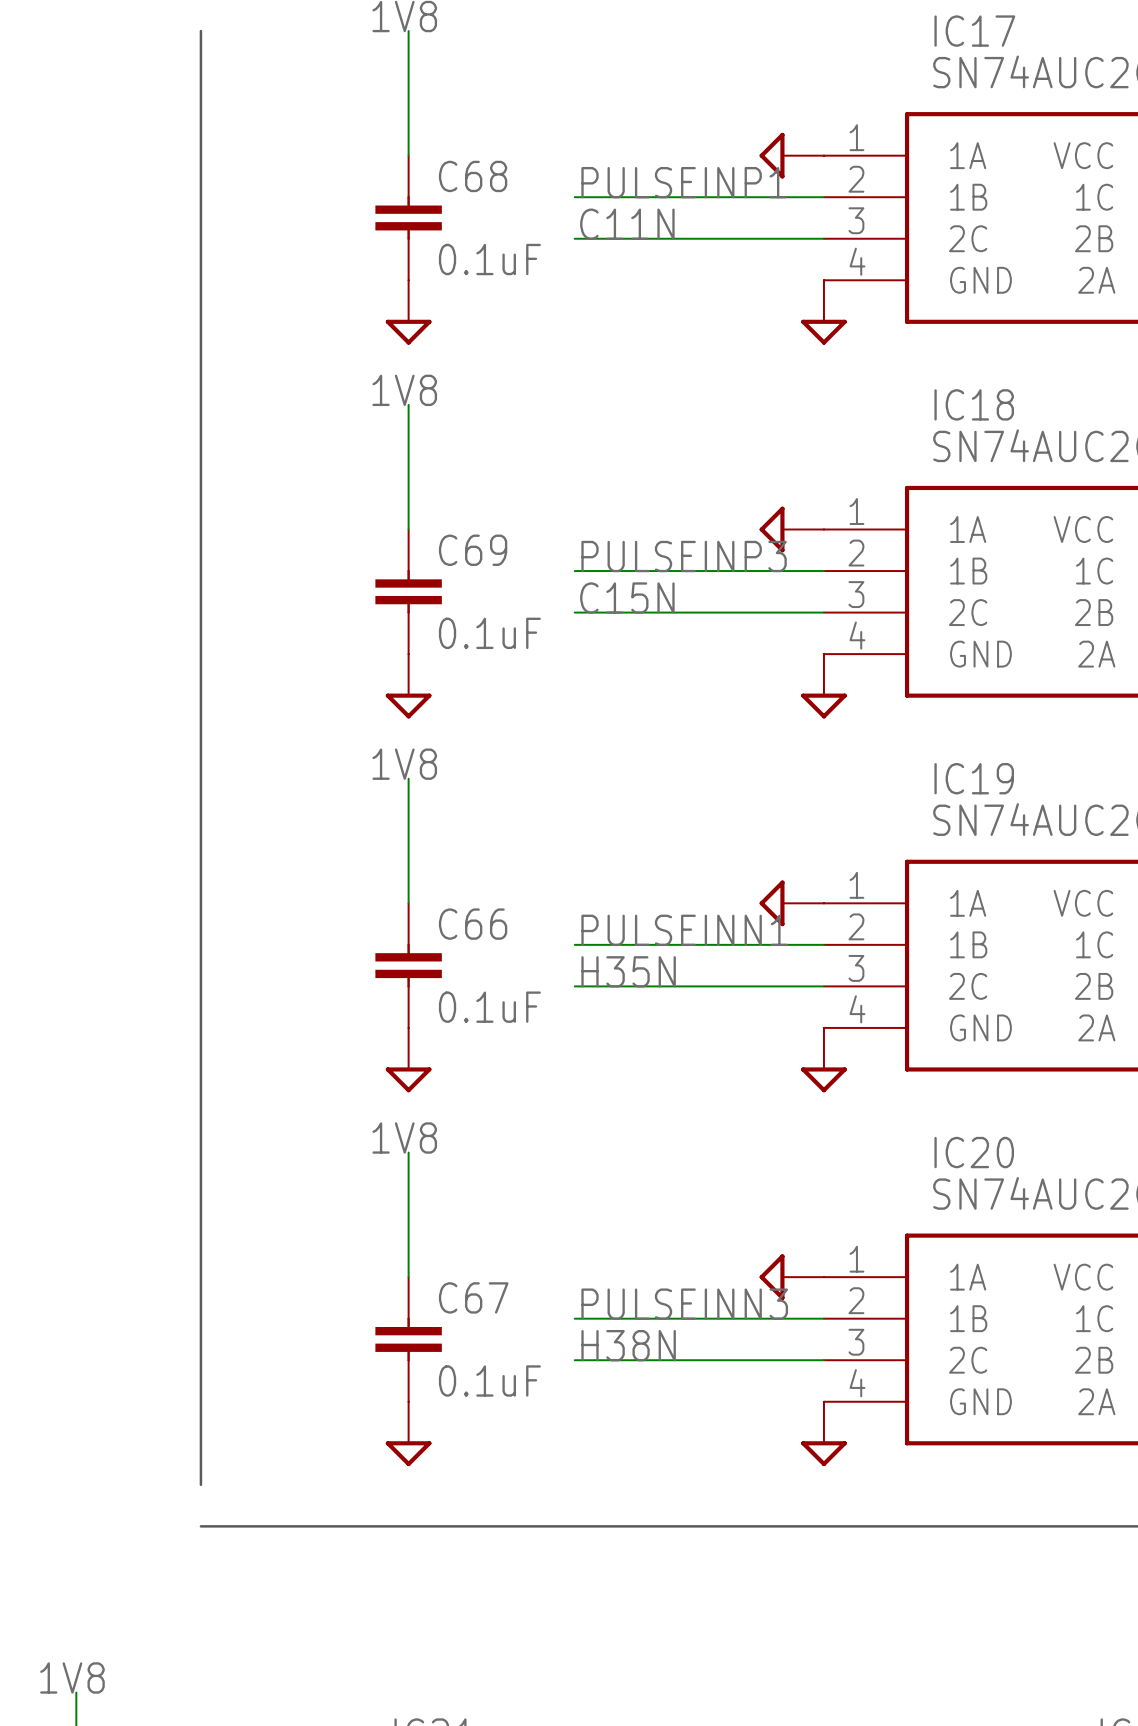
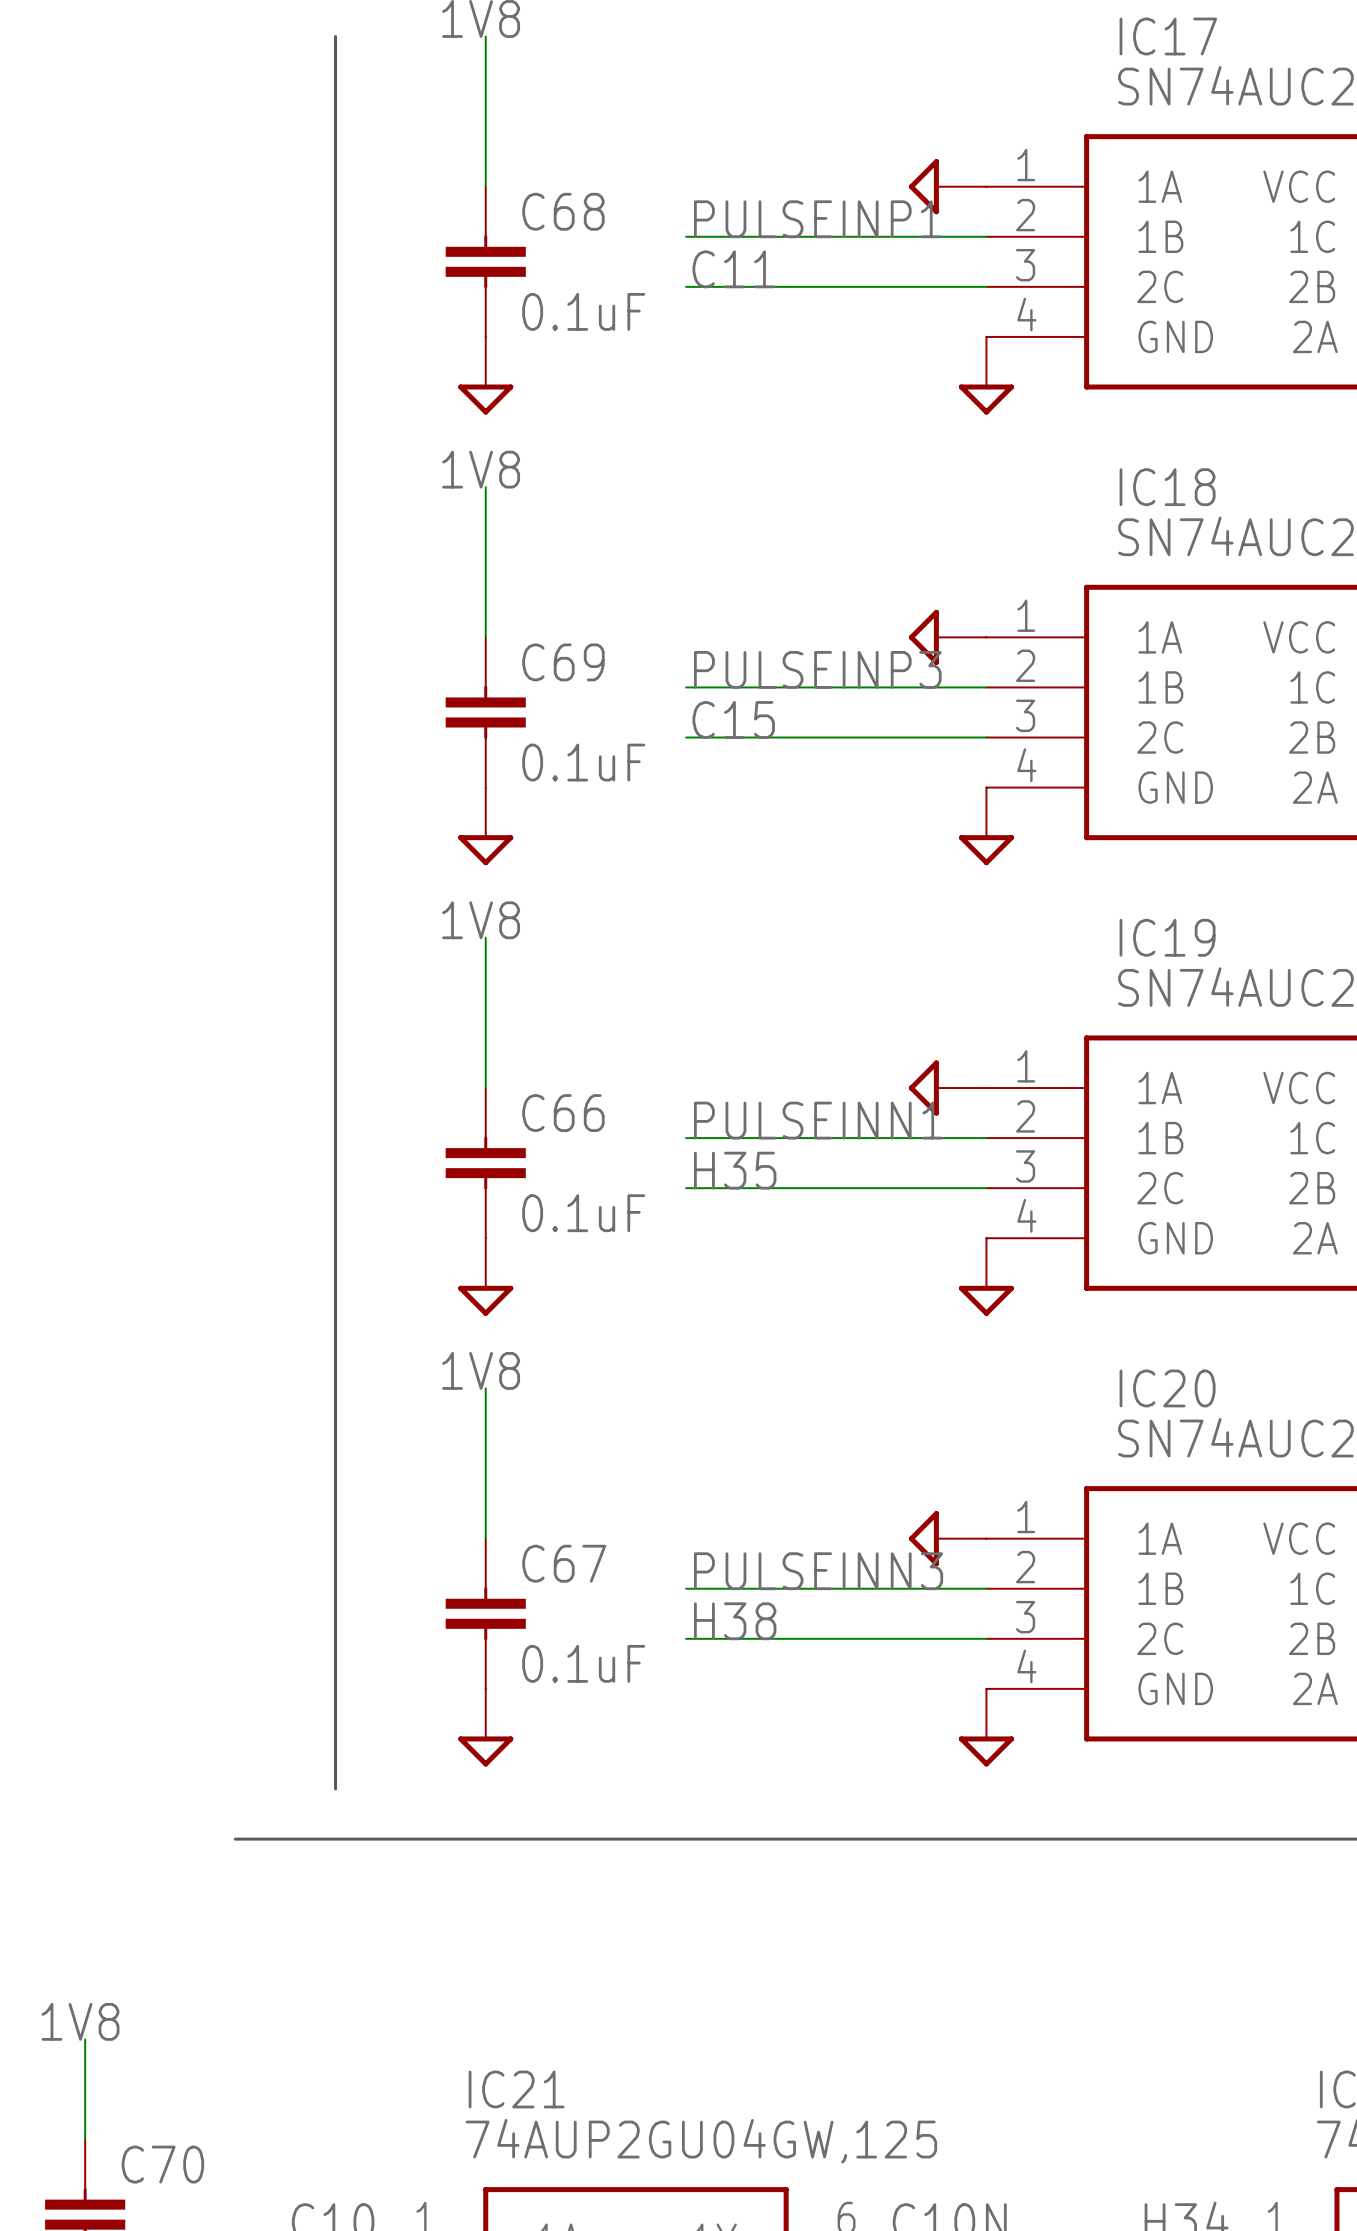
line: (200, 31) (200, 1484) -> (335, 36) (335, 1789)
label: C11N (627, 224) -> C11 (733, 269)
label: C15N (627, 598) -> C15 (733, 719)
label: H35N (628, 971) -> H35 (735, 1170)
label: H38N (628, 1345) -> H38 (735, 1621)

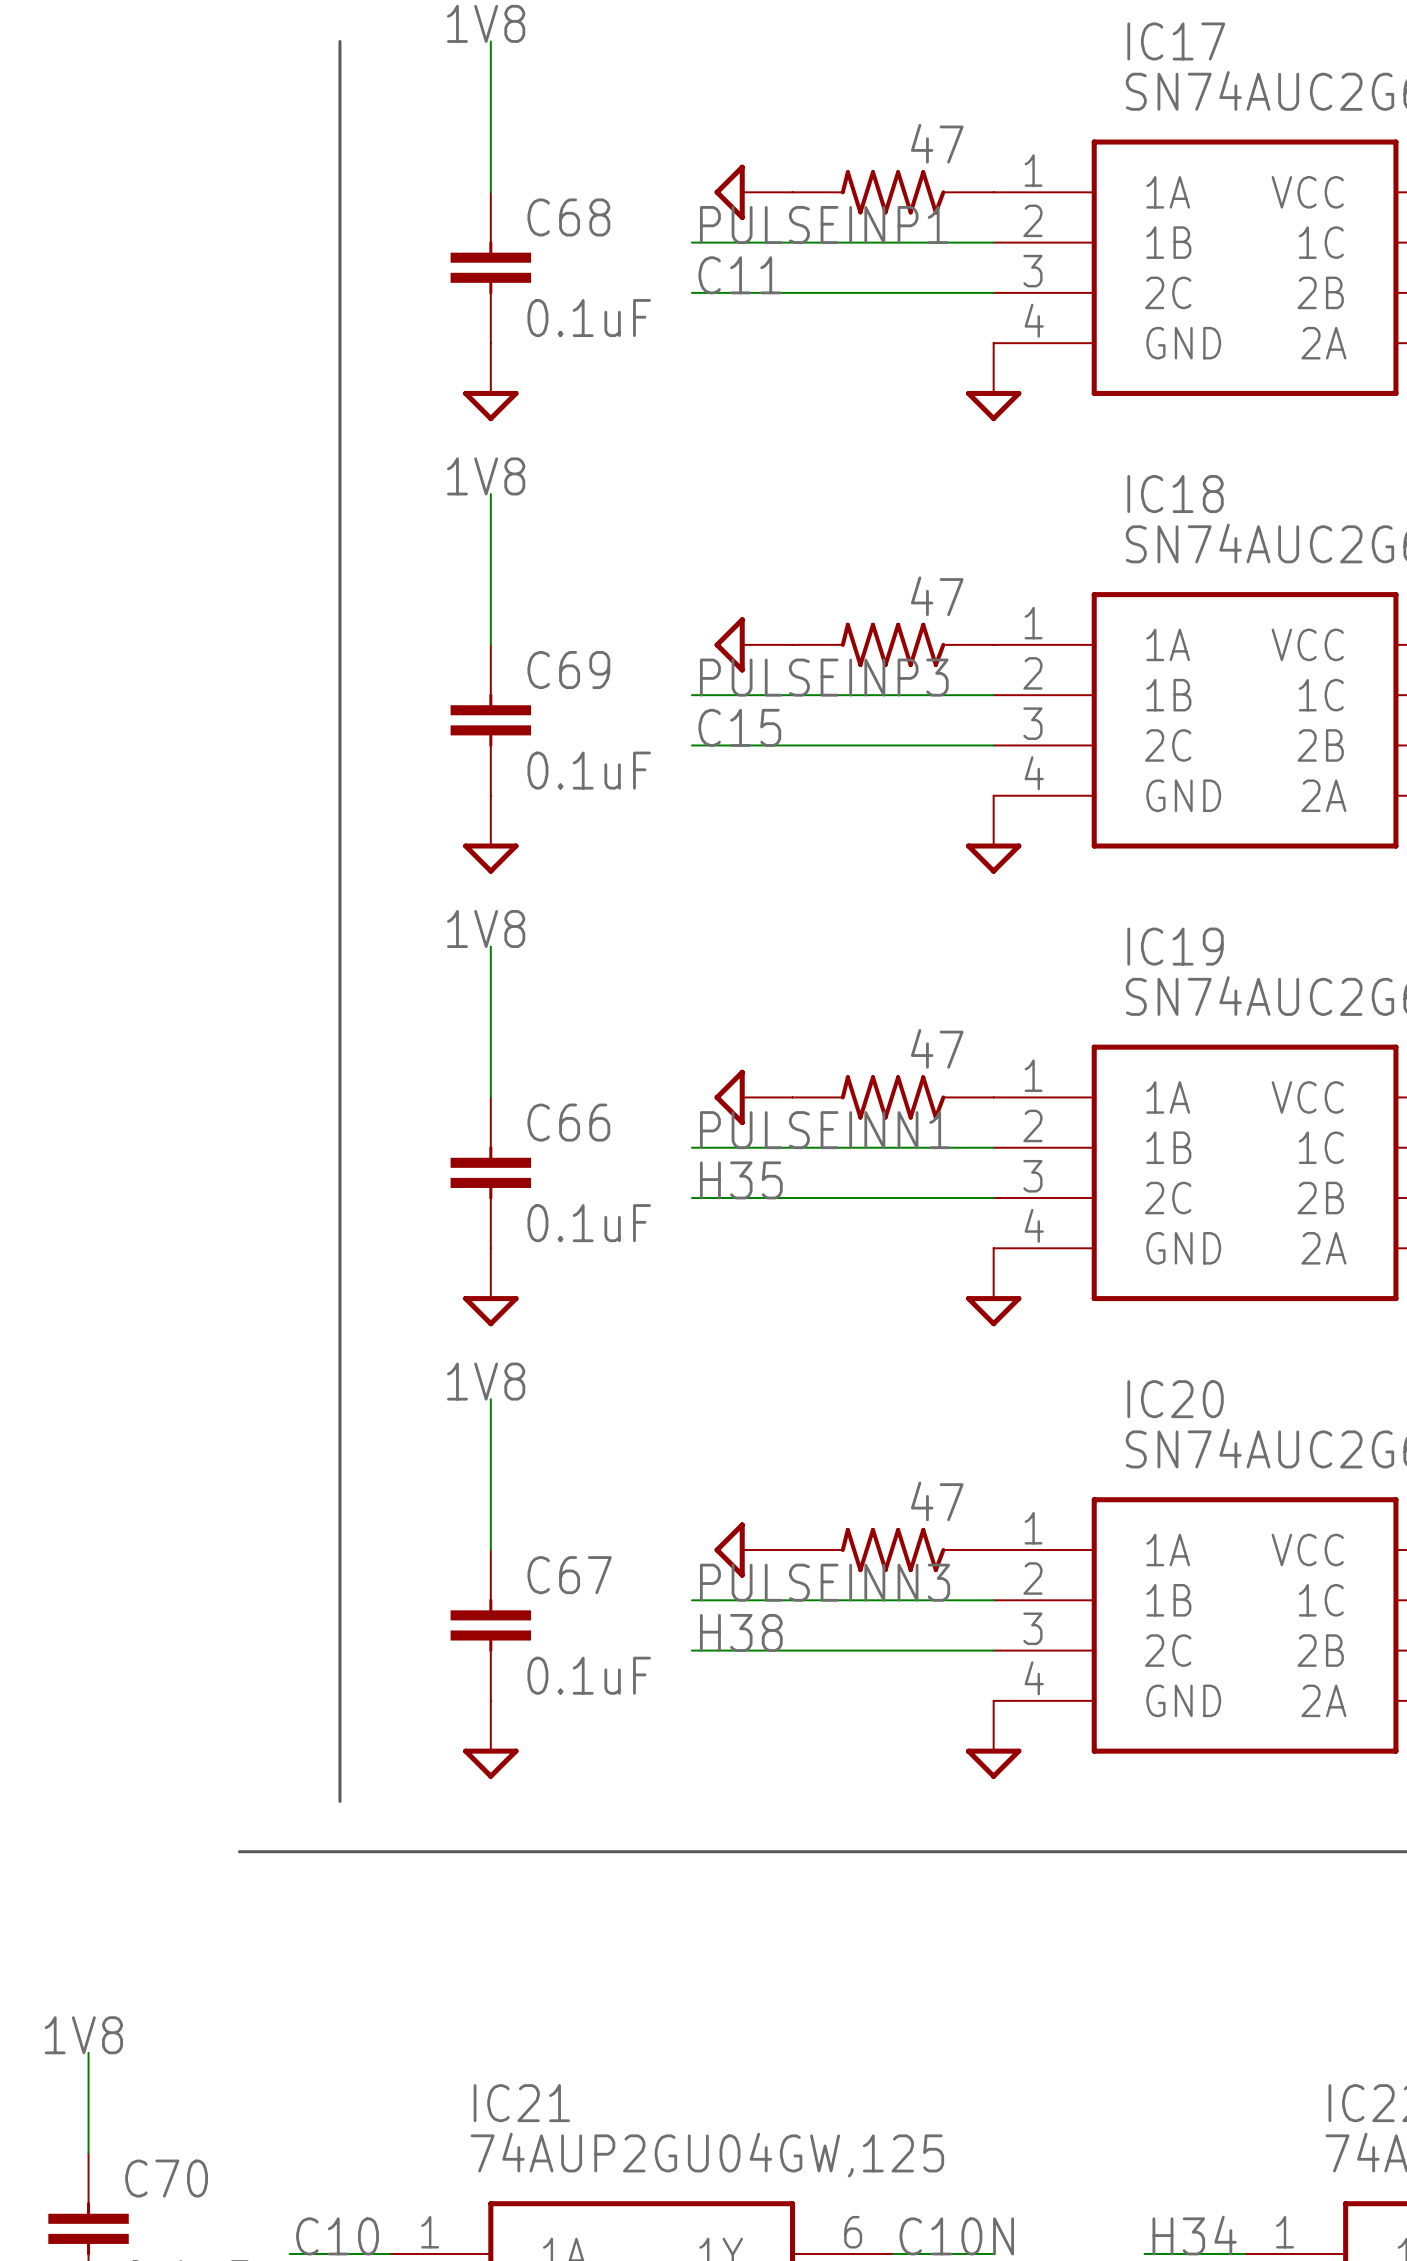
part: none -> 47 (893, 192)
power symbol position: (947, 186) -> (753, 192)
part: none -> 47 (893, 644)
power symbol position: (947, 637) -> (753, 644)
part: none -> 47 (893, 1097)
power symbol position: (947, 1088) -> (753, 1097)
part: none -> 47 (893, 1550)
power symbol position: (947, 1538) -> (753, 1550)

